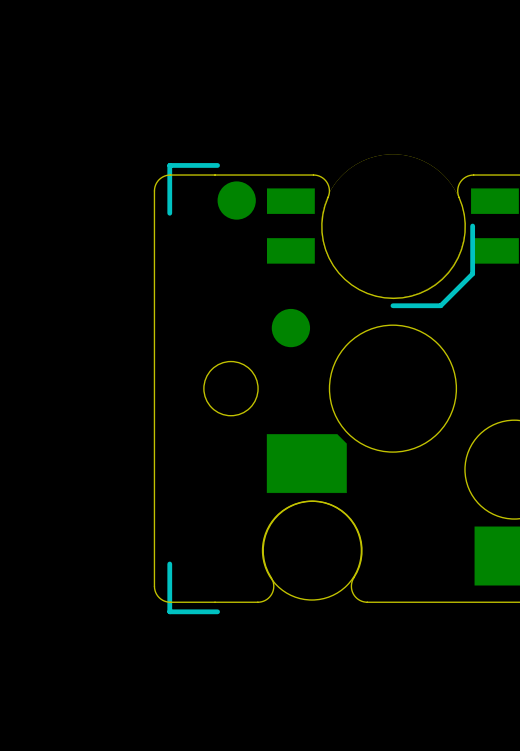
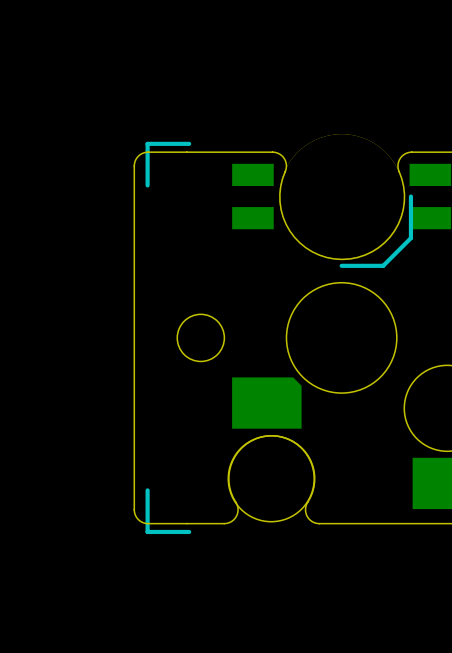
part: (236, 200) -> none
part: (290, 328) -> none

